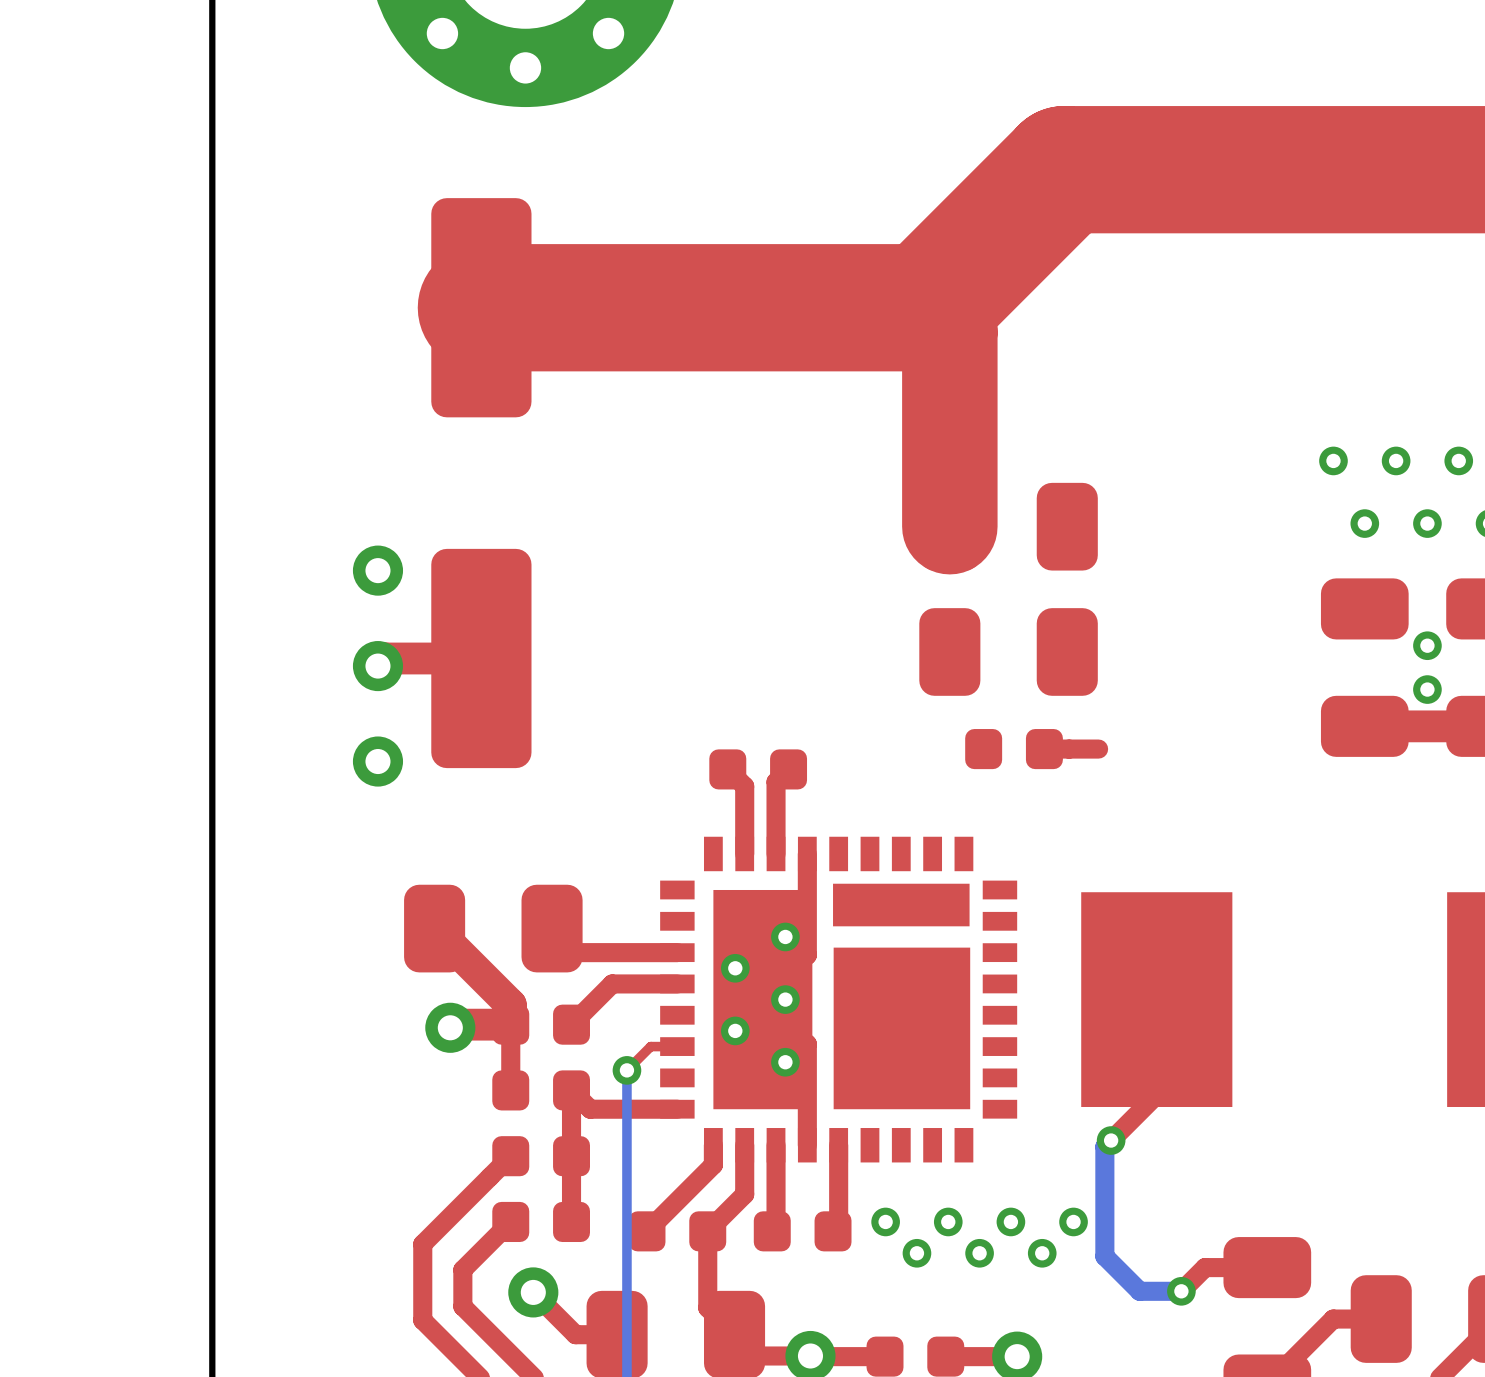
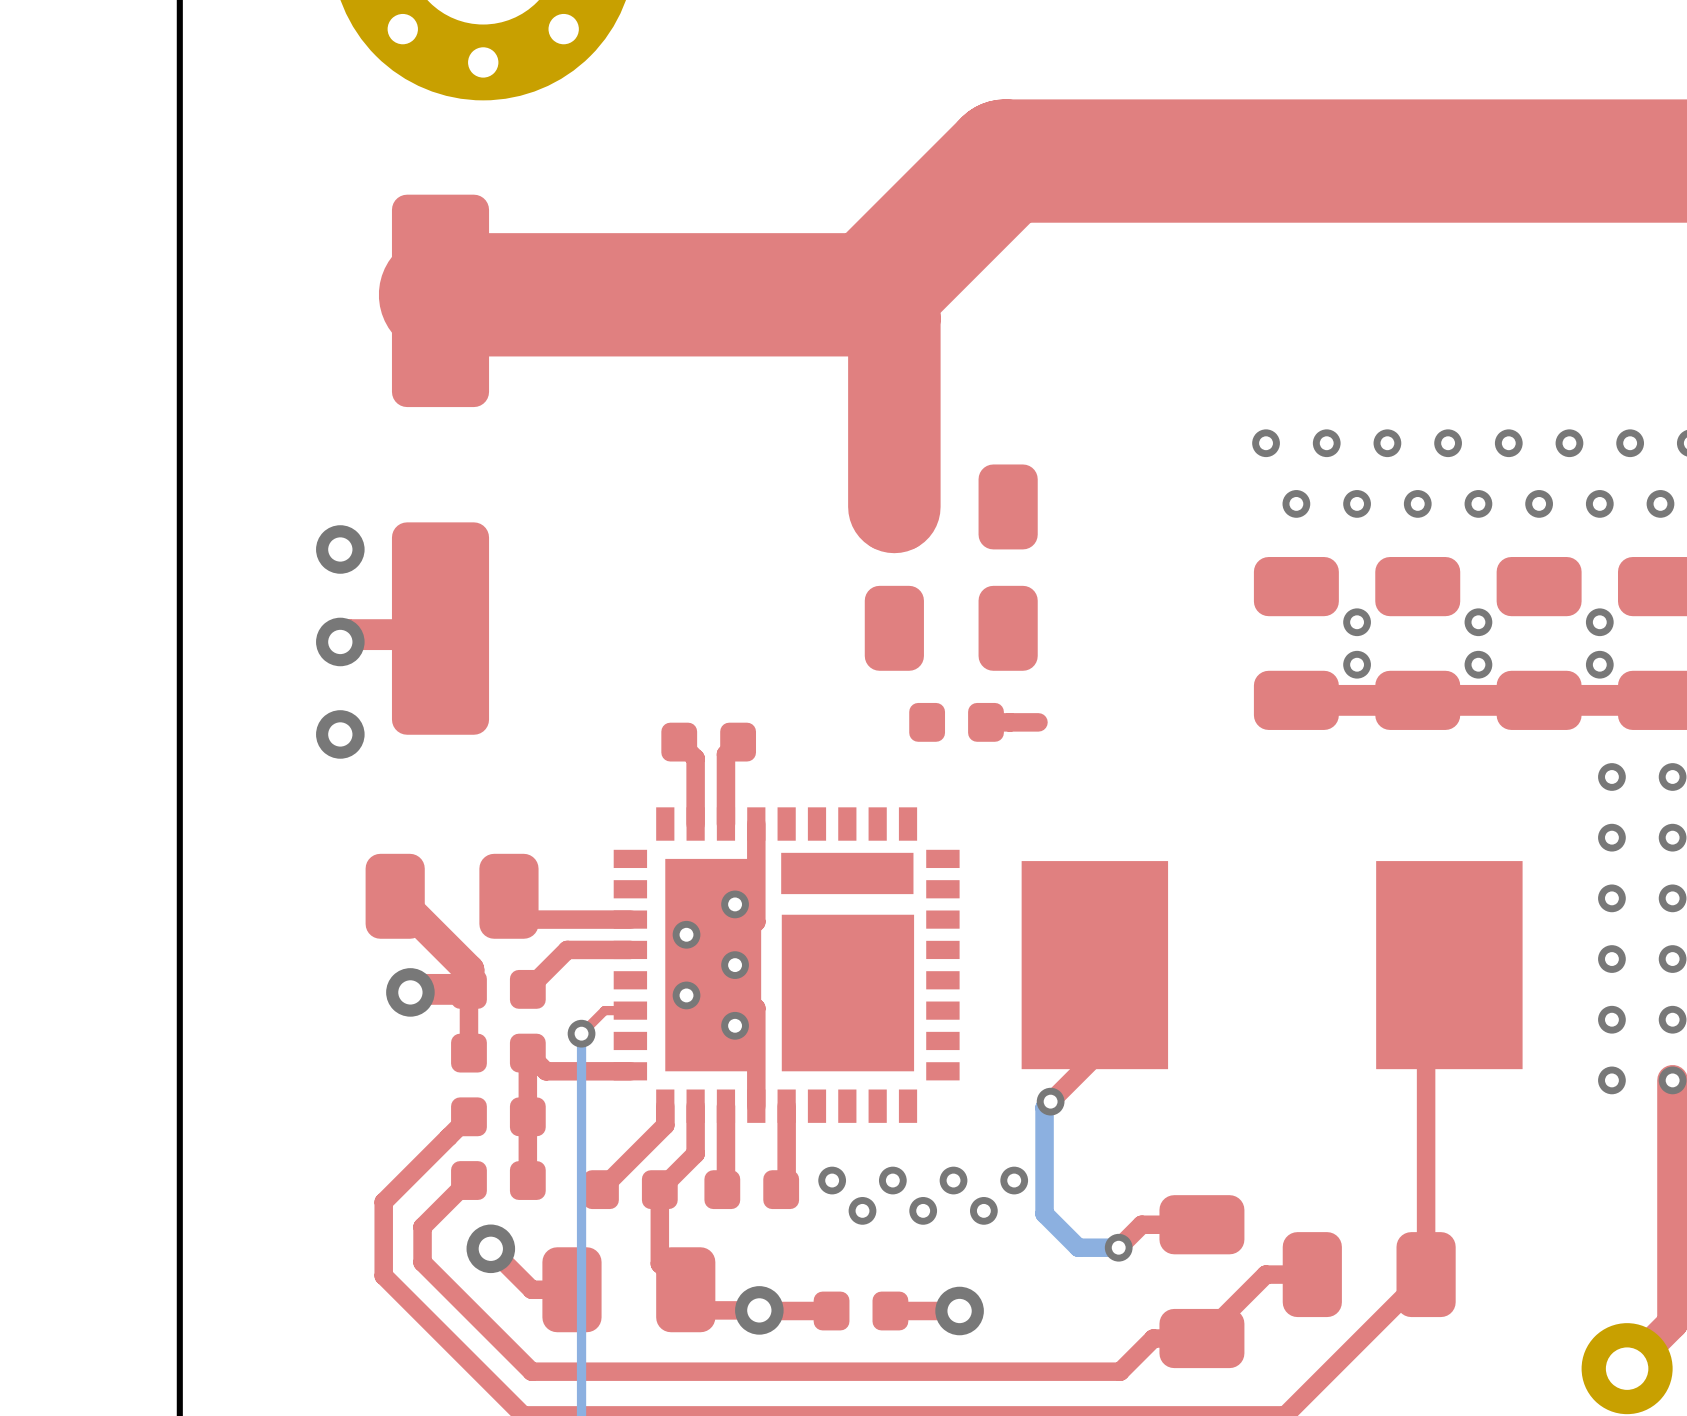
part footprint: [431, 198, 532, 769] -> [391, 194, 490, 735]

